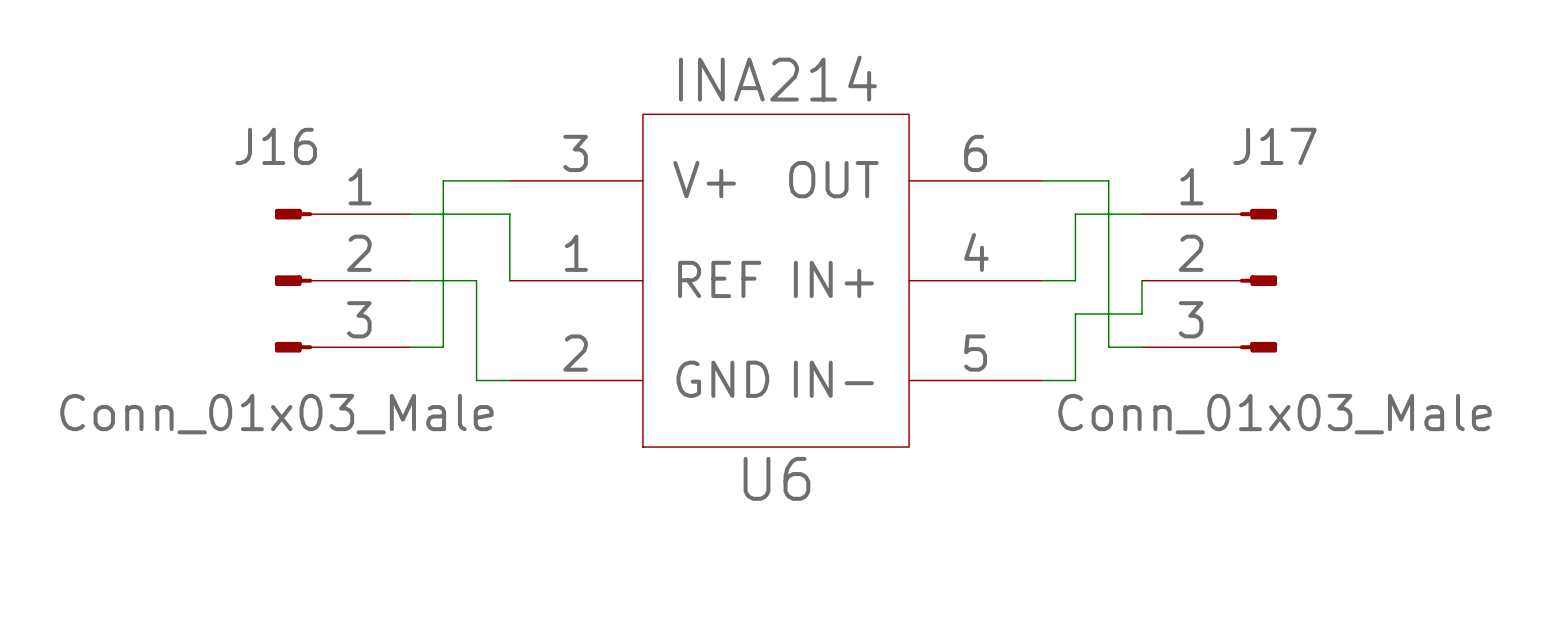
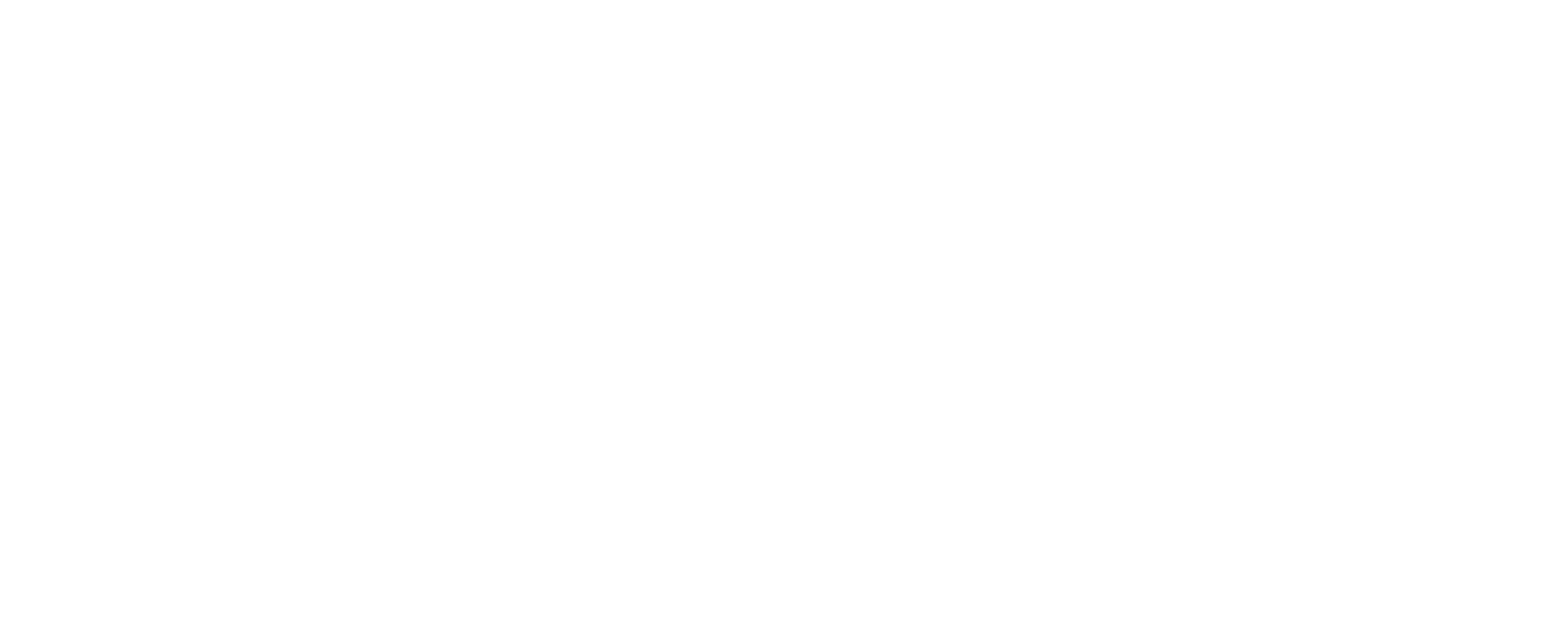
wire: (509, 180) (443, 180) (443, 347) (410, 347) -> none
wire: (1042, 180) (1108, 180) (1108, 347) (1141, 347) -> none
wire: (410, 214) (509, 214) (509, 280) -> none
wire: (1141, 214) (1075, 214) (1075, 280) (1042, 280) -> none
J16: Conn_01x03_Male (342, 280) -> none
wire: (410, 280) (476, 280) (476, 380) (509, 380) -> none
U6: INA214 (776, 280) -> none
wire: (1141, 280) (1141, 313) (1075, 313) (1075, 380) (1042, 380) -> none
J17: Conn_01x03_Male (1209, 280) -> none

